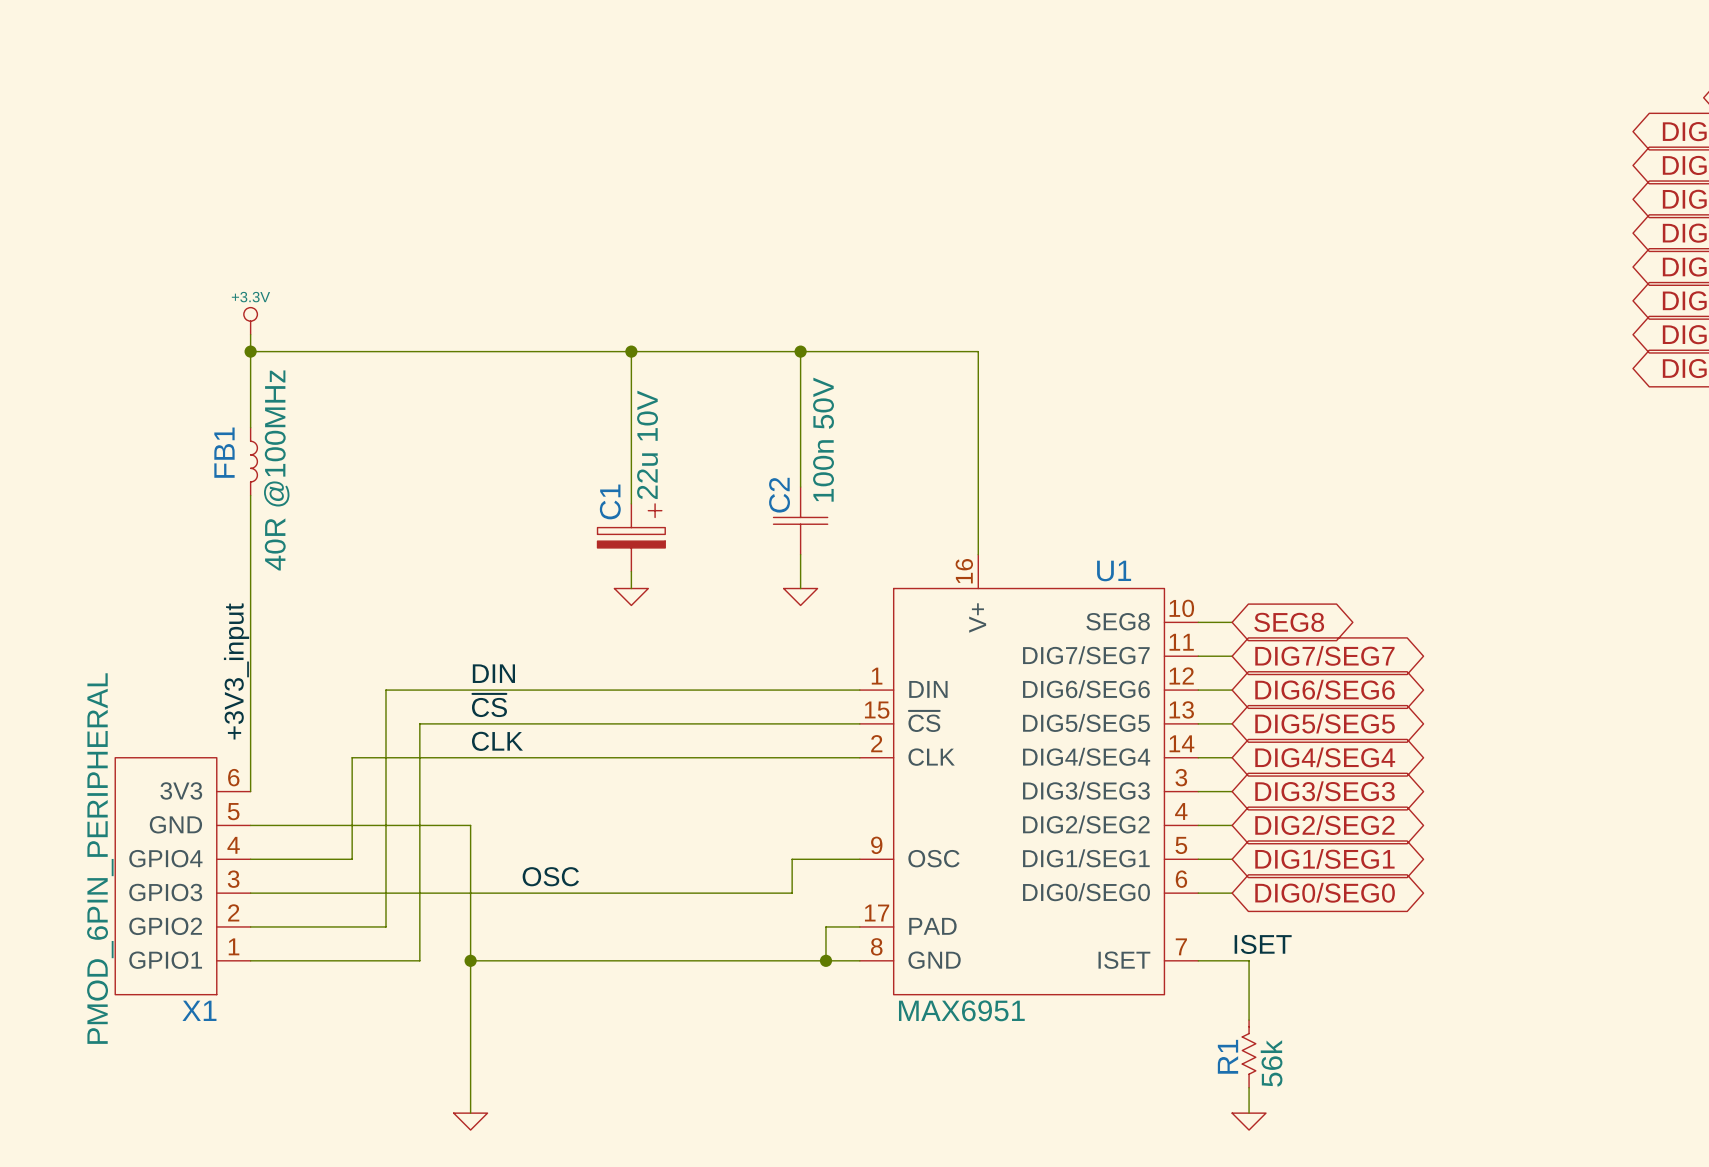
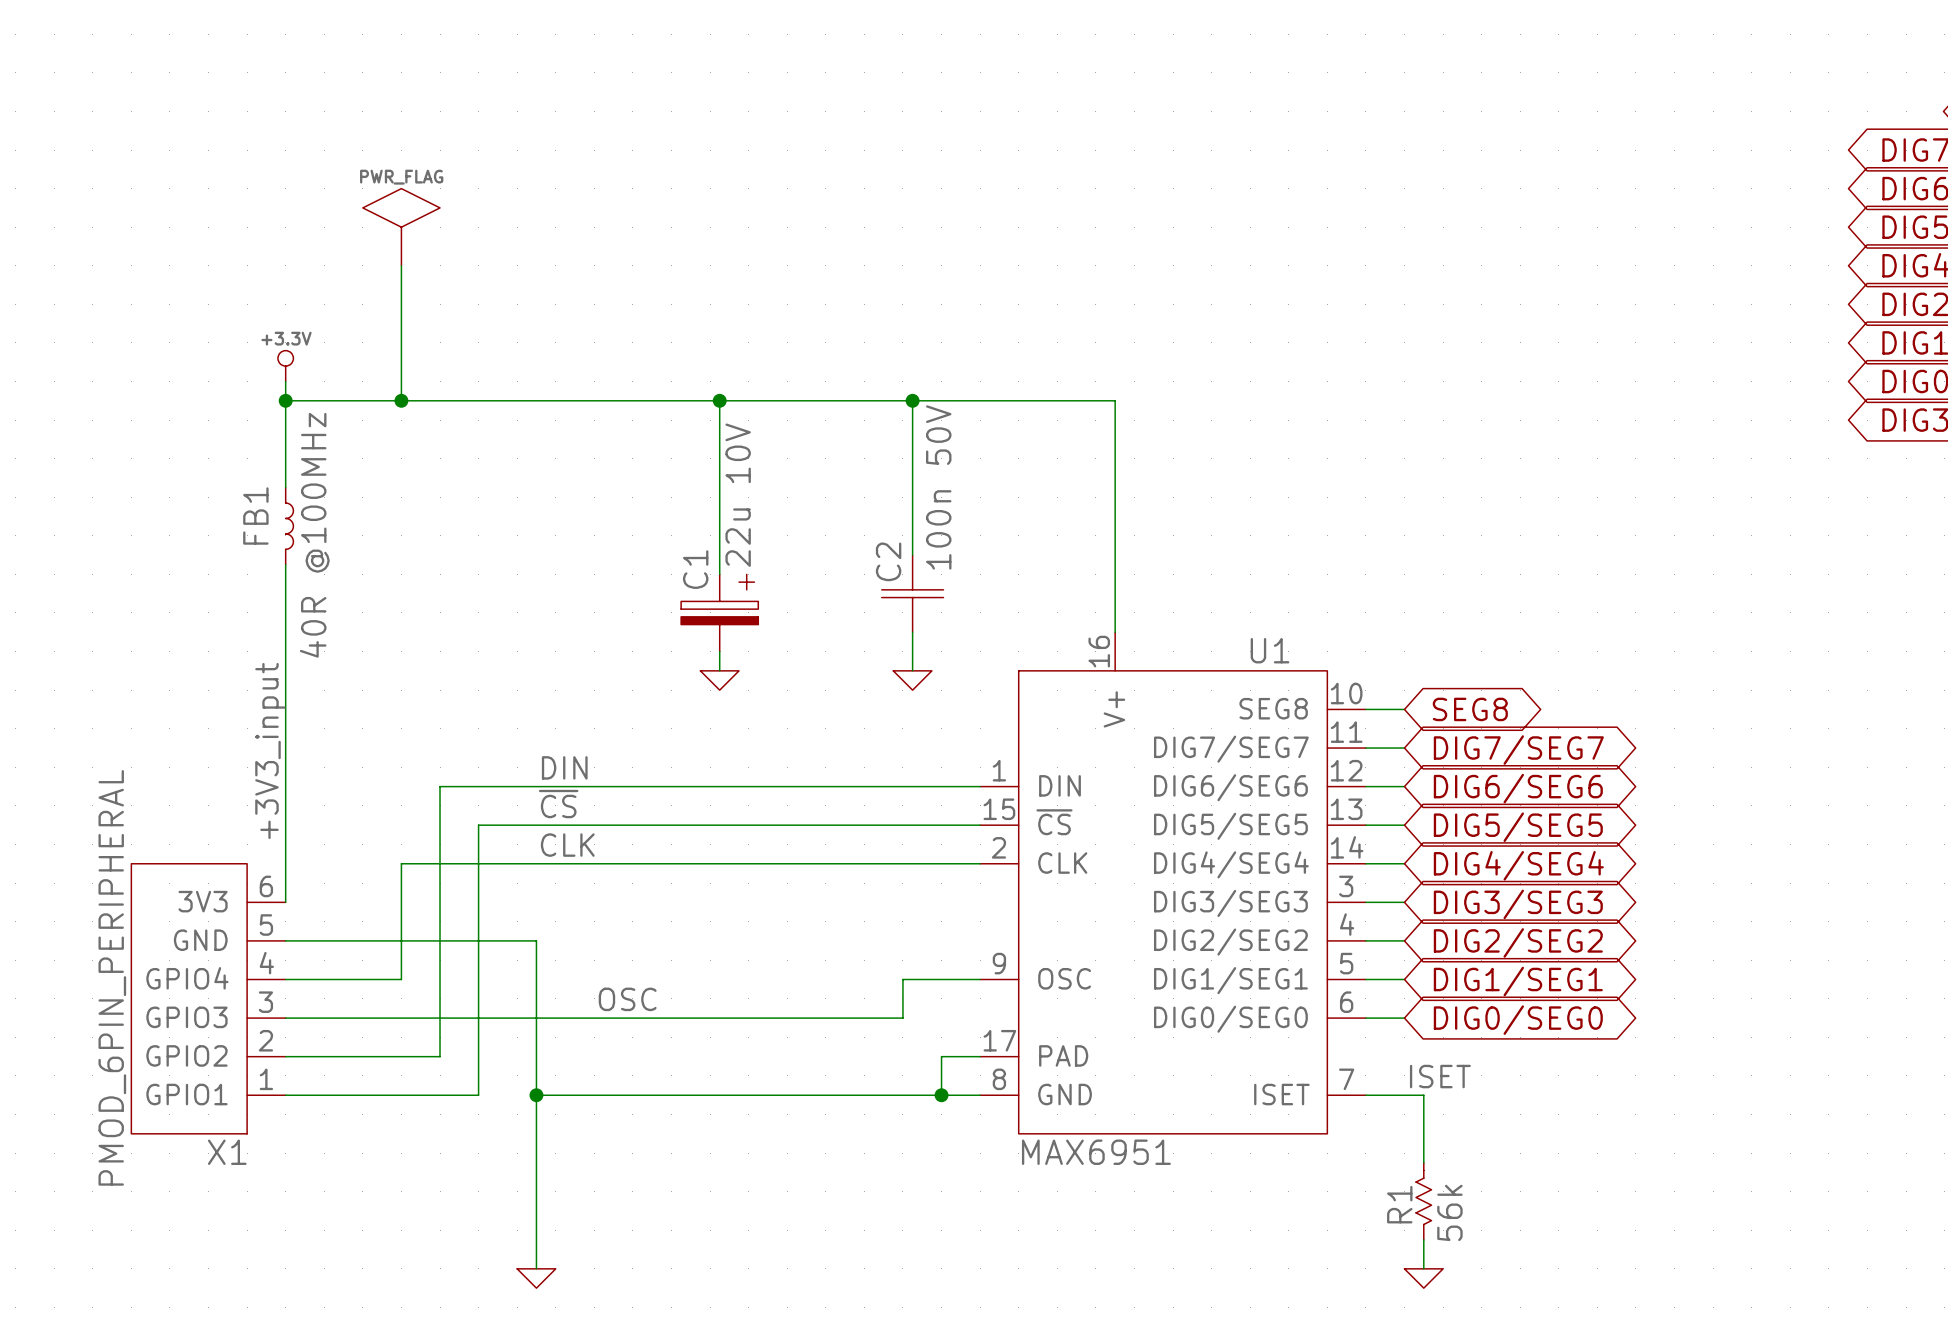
power symbol: none -> PWR_FLAG (401, 227)
wire: none -> (401, 265) (401, 400)
junction: none -> (401, 400)

